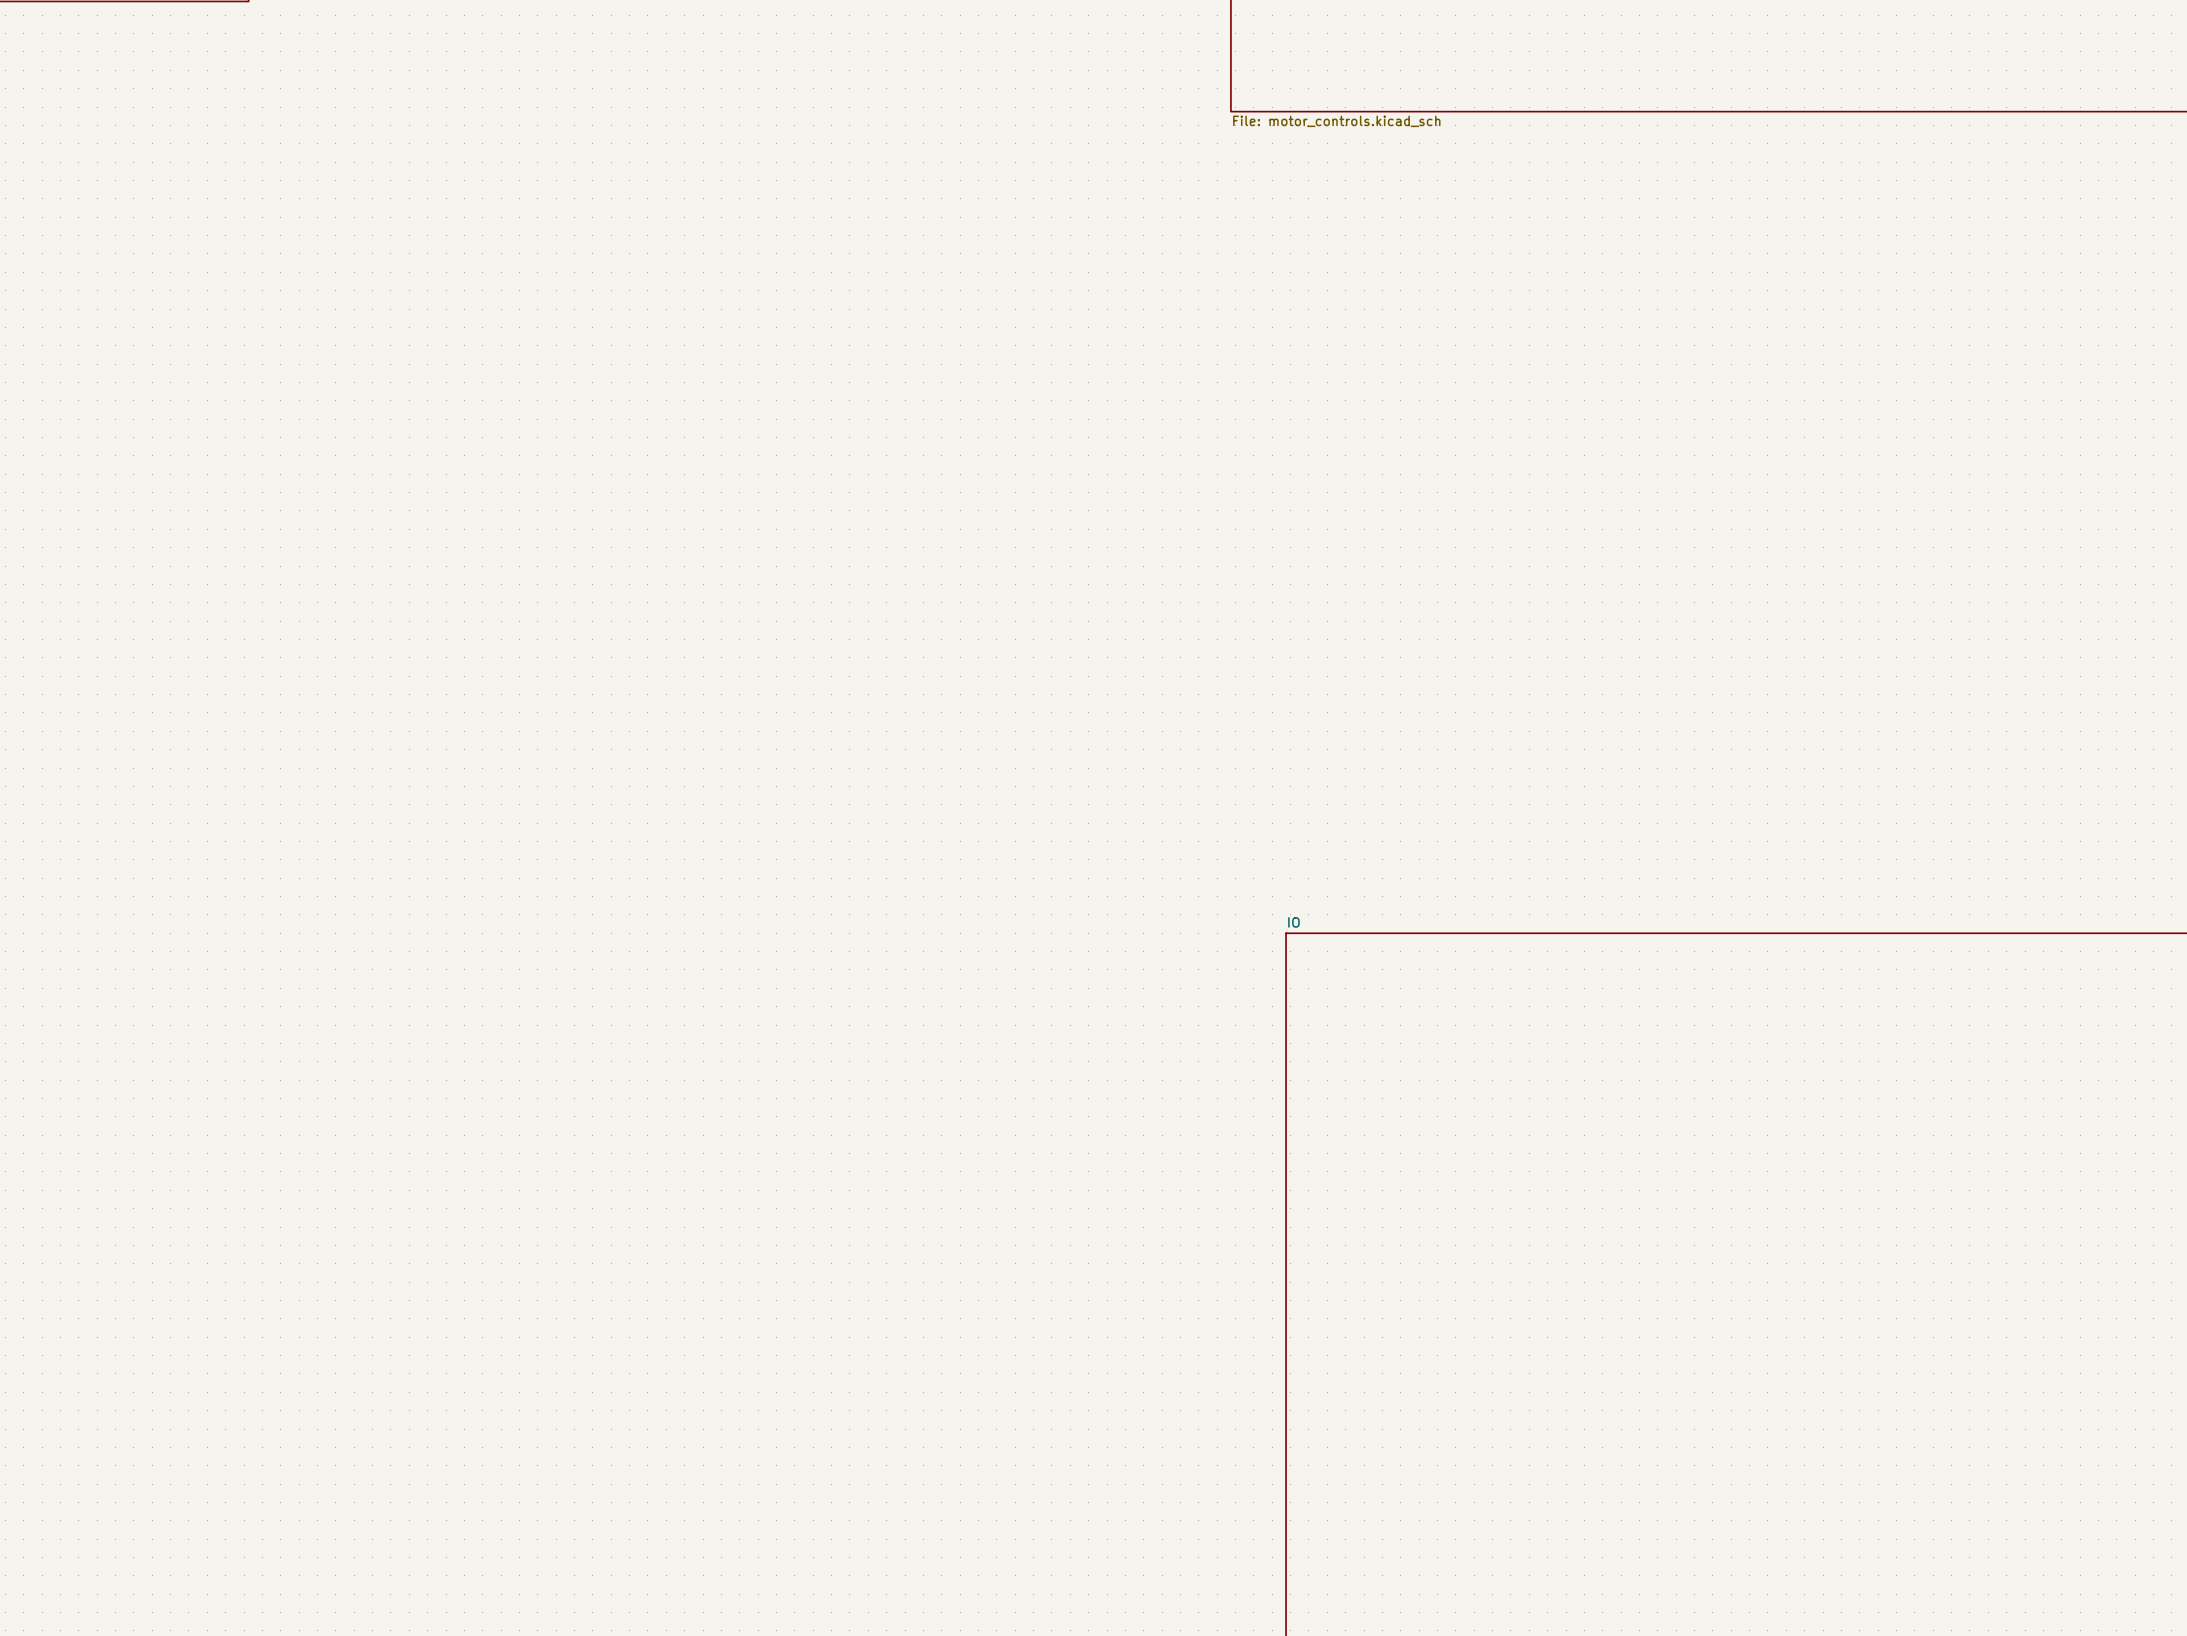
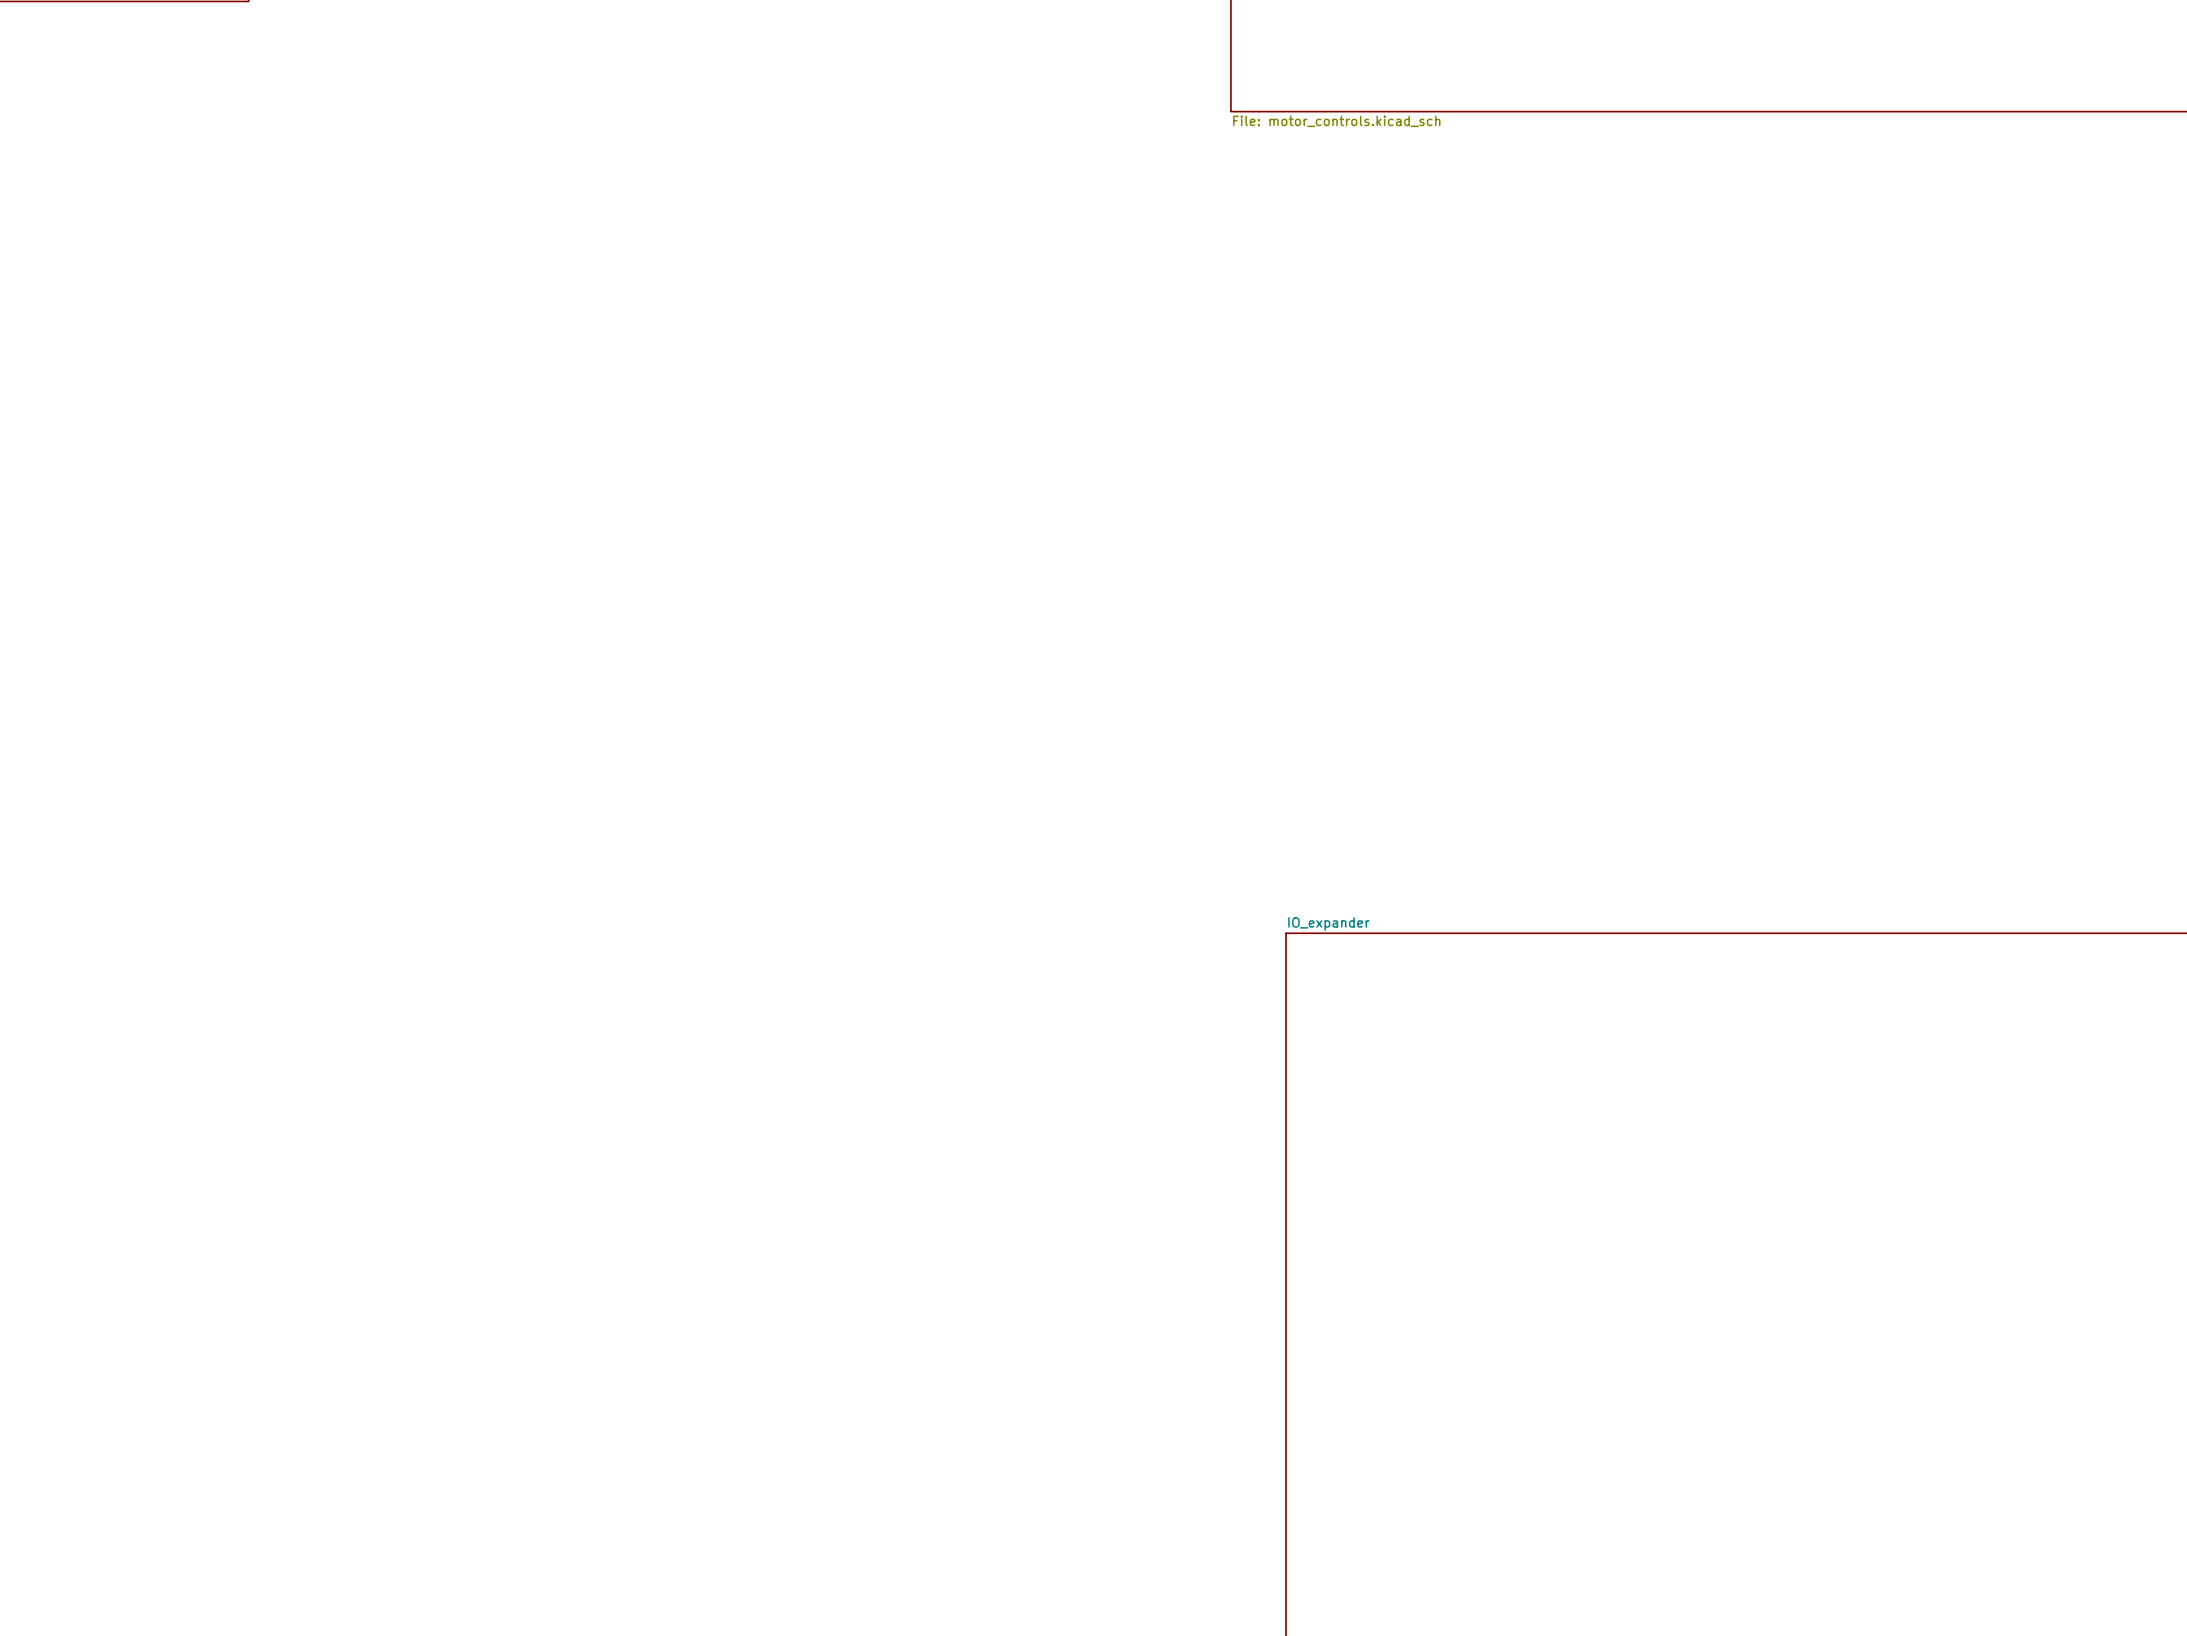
sheet IO name: IO (1293, 922) -> IO_expander (1328, 923)

